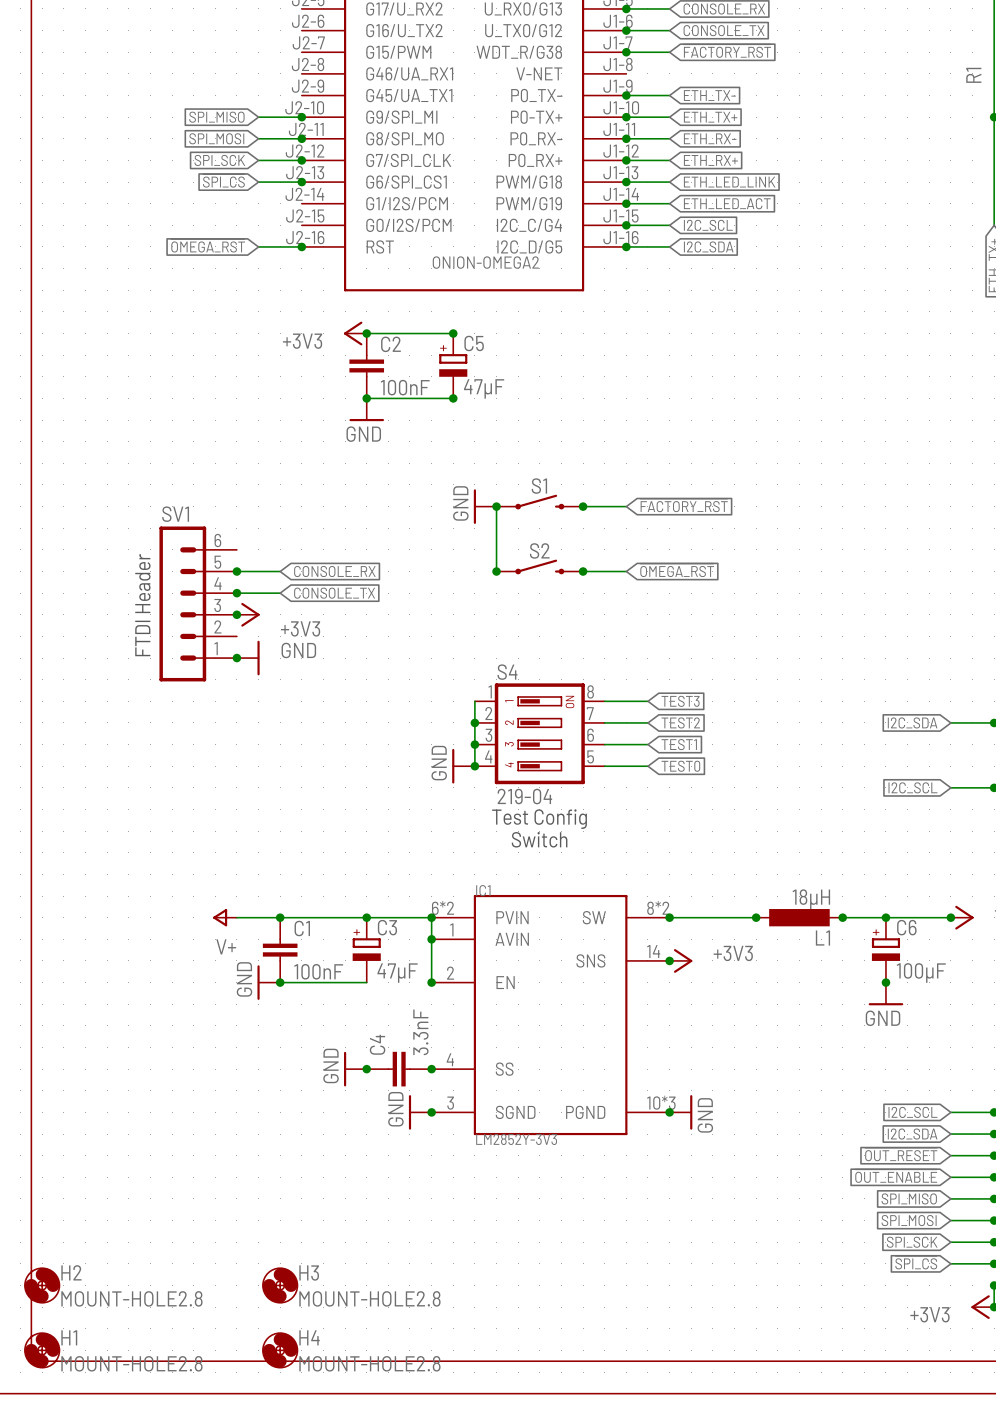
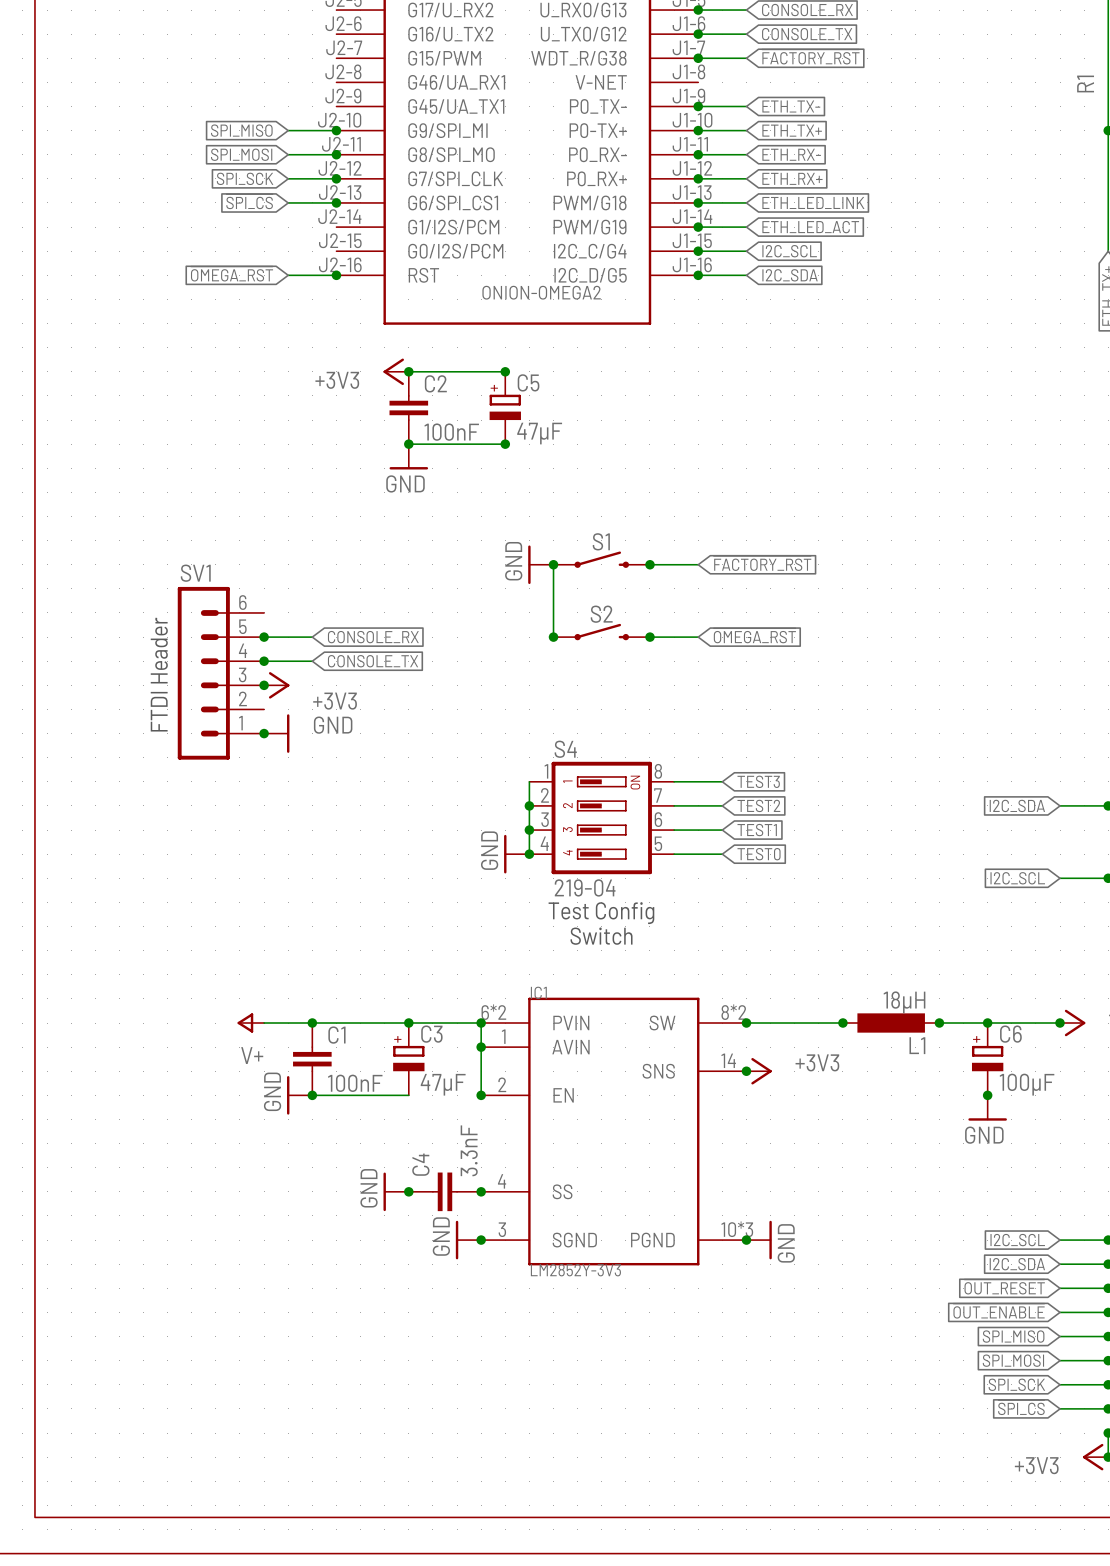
H2: MOUNT-HOLE2.8 (42, 1285) -> none
H3: MOUNT-HOLE2.8 (280, 1285) -> none
H1: MOUNT-HOLE2.8 (42, 1350) -> none
H4: MOUNT-HOLE2.8 (280, 1350) -> none

